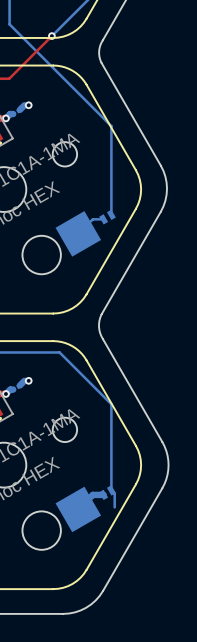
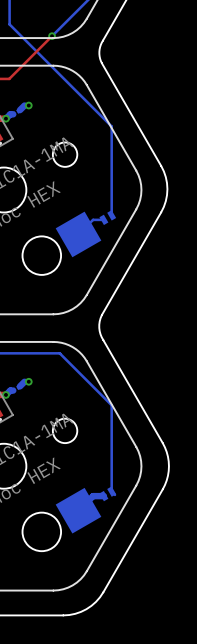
bottom track: (114, 493) (114, 507) -> none

